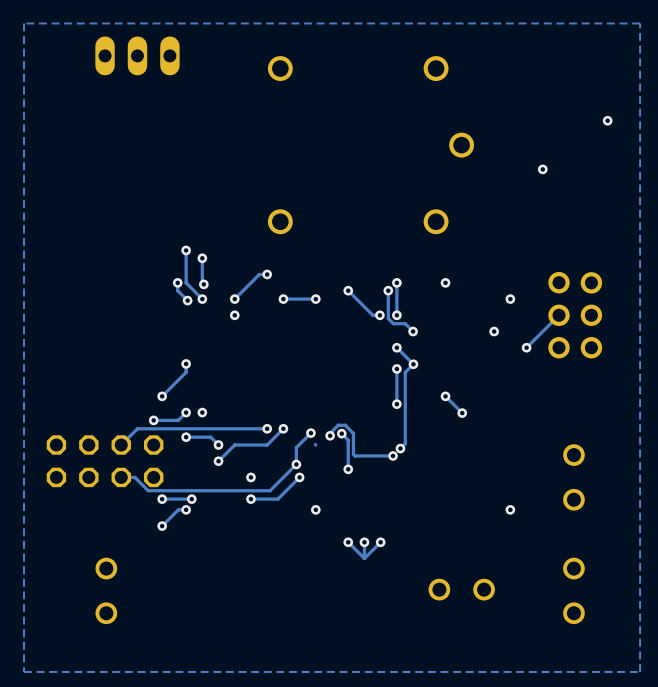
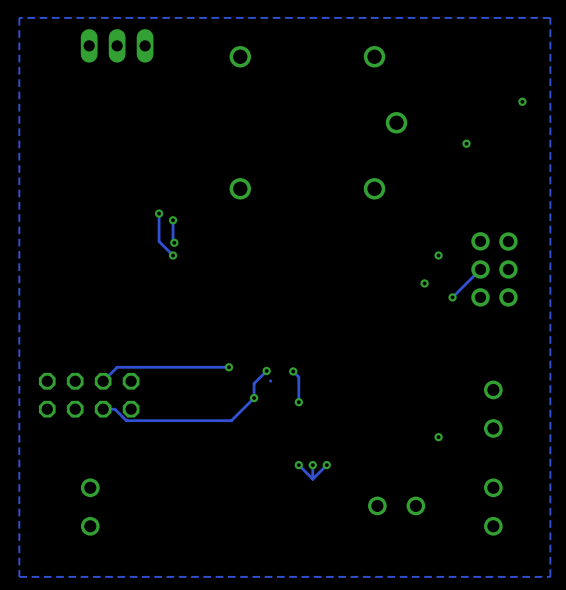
track: (267, 274) (259, 274) (234, 299) -> none
via: (267, 274) -> none
track: (177, 282) (177, 290) (187, 300) -> none
via: (177, 282) -> none
track: (396, 282) (396, 315) -> none
via: (396, 282) -> none
via: (445, 282) -> none
track: (348, 290) (372, 315) (379, 315) -> none
via: (348, 290) -> none
track: (388, 290) (388, 318) (393, 323) (405, 323) (413, 331) -> none
via: (388, 290) -> none
via: (234, 299) -> none
via: (283, 299) -> none
track: (315, 299) (283, 299) -> none
via: (315, 299) -> none
via: (187, 300) -> none
via: (234, 315) -> none
via: (379, 315) -> none
via: (396, 315) -> none
via: (413, 331) -> none
track: (396, 347) (413, 364) (405, 372) (405, 443) (400, 448) -> none
via: (396, 347) -> none
track: (186, 363) (186, 372) (162, 396) -> none
via: (186, 363) -> none
via: (413, 364) -> none
track: (396, 368) (396, 404) -> none
via: (396, 368) -> none
via: (162, 396) -> none
track: (445, 396) (462, 413) -> none
via: (445, 396) -> none
via: (396, 404) -> none
track: (186, 412) (178, 420) (153, 420) -> none
via: (186, 412) -> none
via: (202, 412) -> none
via: (462, 413) -> none
via: (153, 420) -> none
track: (283, 428) (267, 445) (234, 445) (218, 461) -> none
via: (283, 428) -> none
track: (330, 435) (338, 425) (345, 425) (353, 433) (353, 454) (355, 455) (393, 455) -> none
via: (330, 435) -> none
track: (186, 437) (210, 437) (218, 445) -> none
via: (186, 437) -> none
via: (218, 445) -> none
via: (400, 448) -> none
via: (393, 455) -> none
via: (218, 461) -> none
via: (250, 477) -> none
track: (299, 477) (277, 499) (250, 499) -> none
via: (299, 477) -> none
via: (162, 499) -> none
track: (191, 499) (162, 499) -> none
via: (191, 499) -> none
via: (250, 499) -> none
track: (186, 509) (178, 509) (162, 526) -> none
via: (186, 509) -> none
via: (315, 509) -> none
via: (162, 526) -> none

